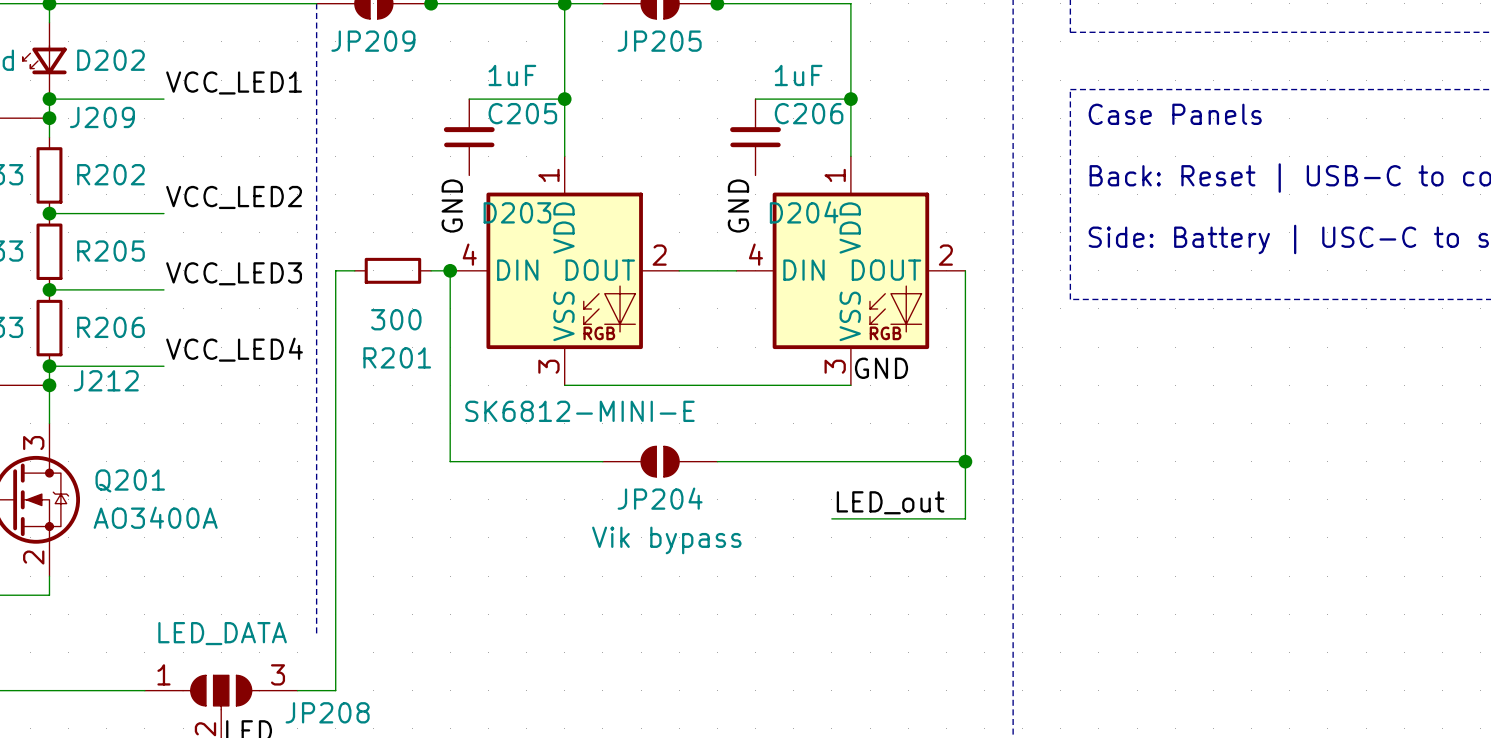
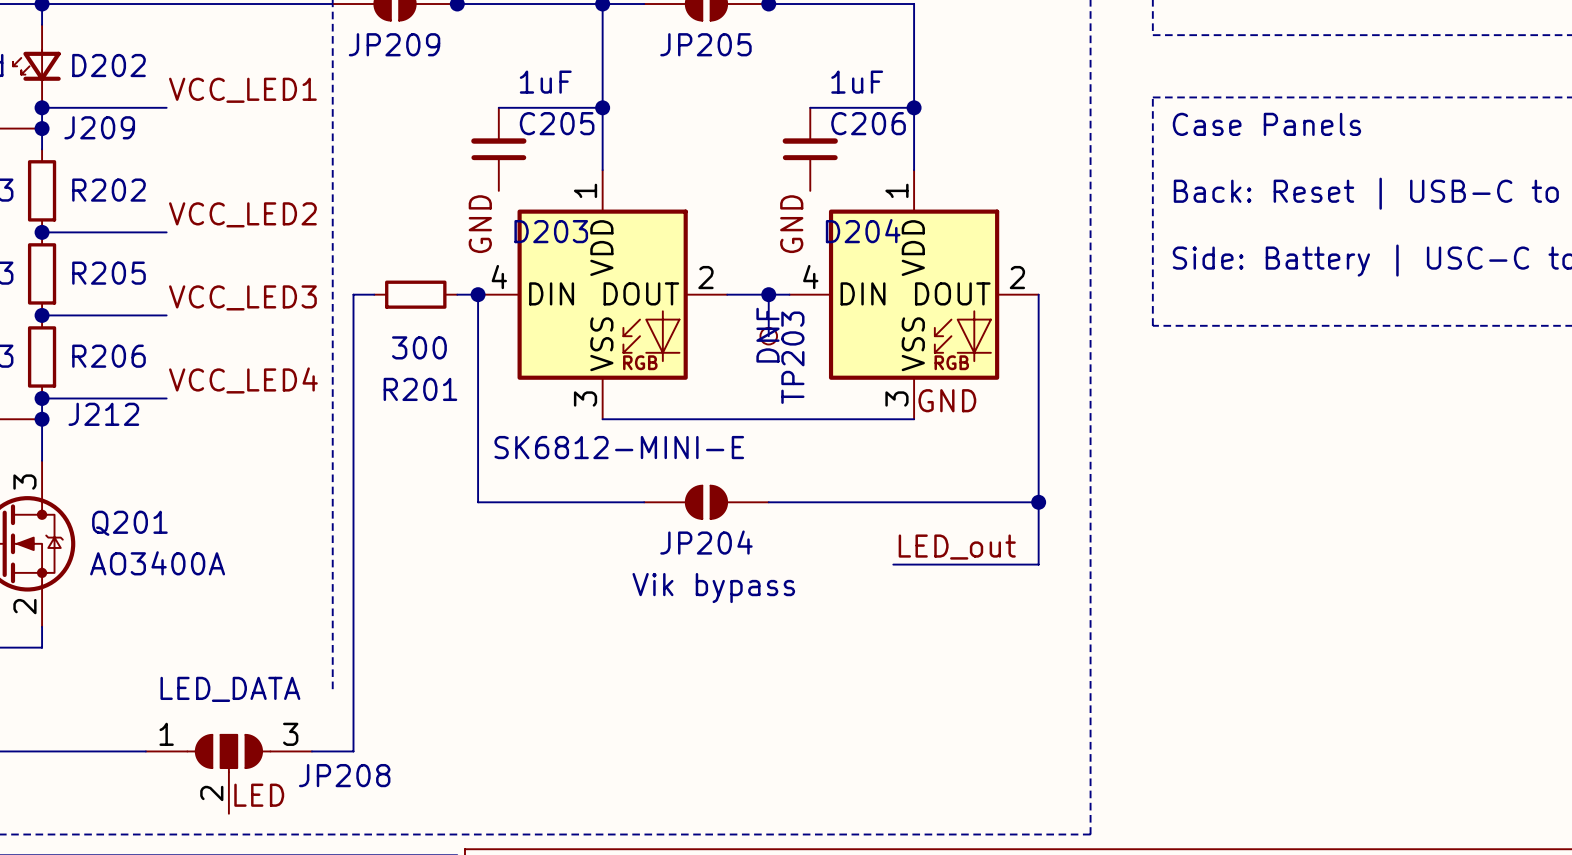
wire: none -> (768, 294) (768, 336)
junction: none -> (768, 294)
TP203: none -> (768, 336)

